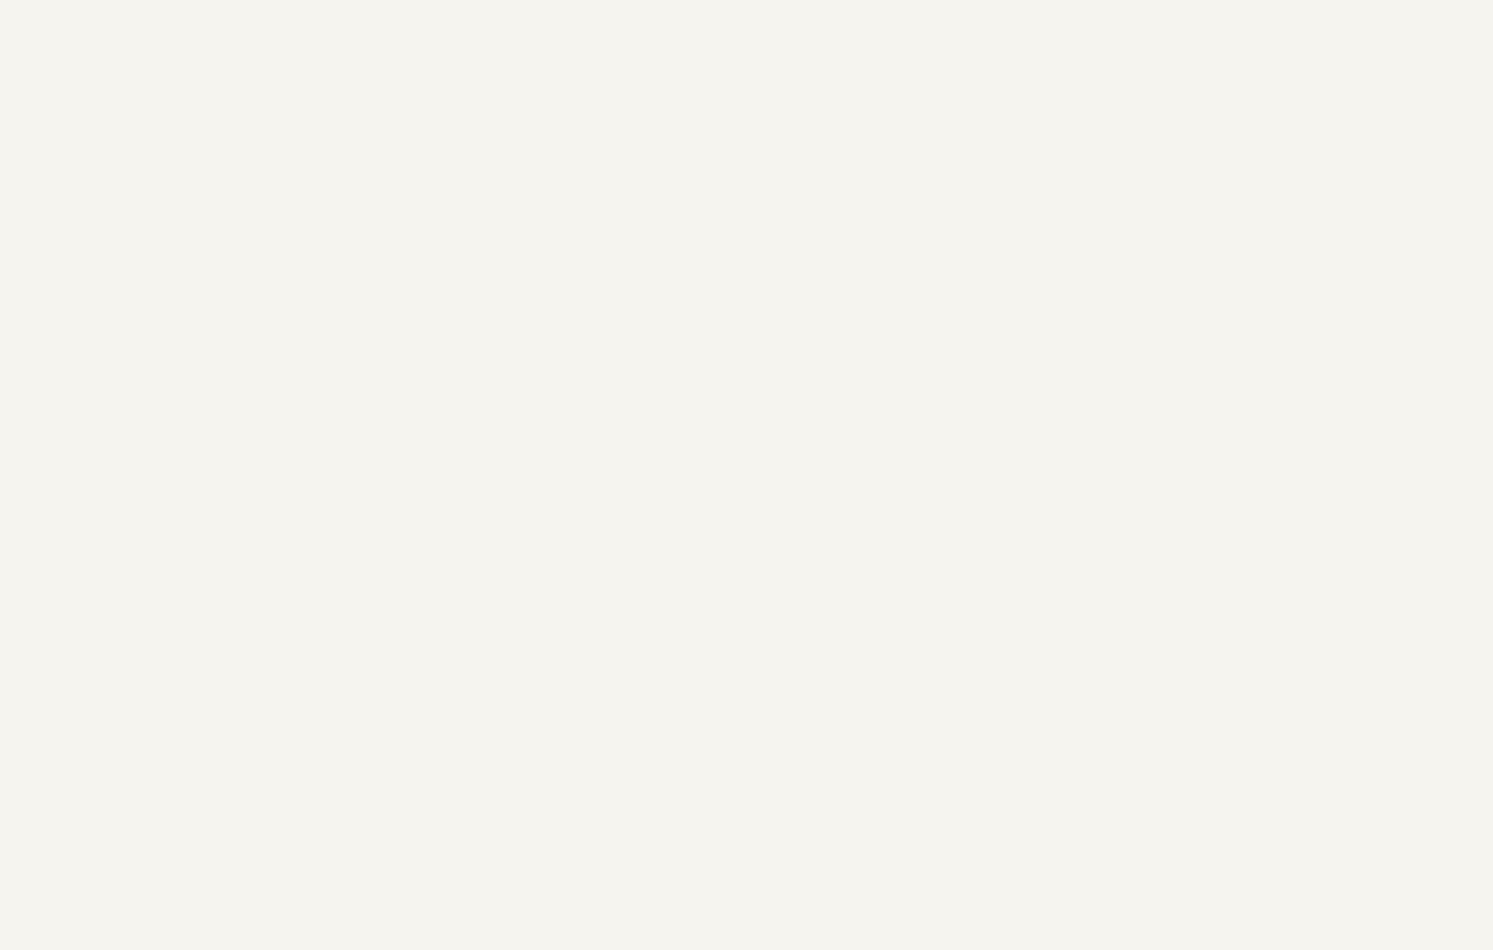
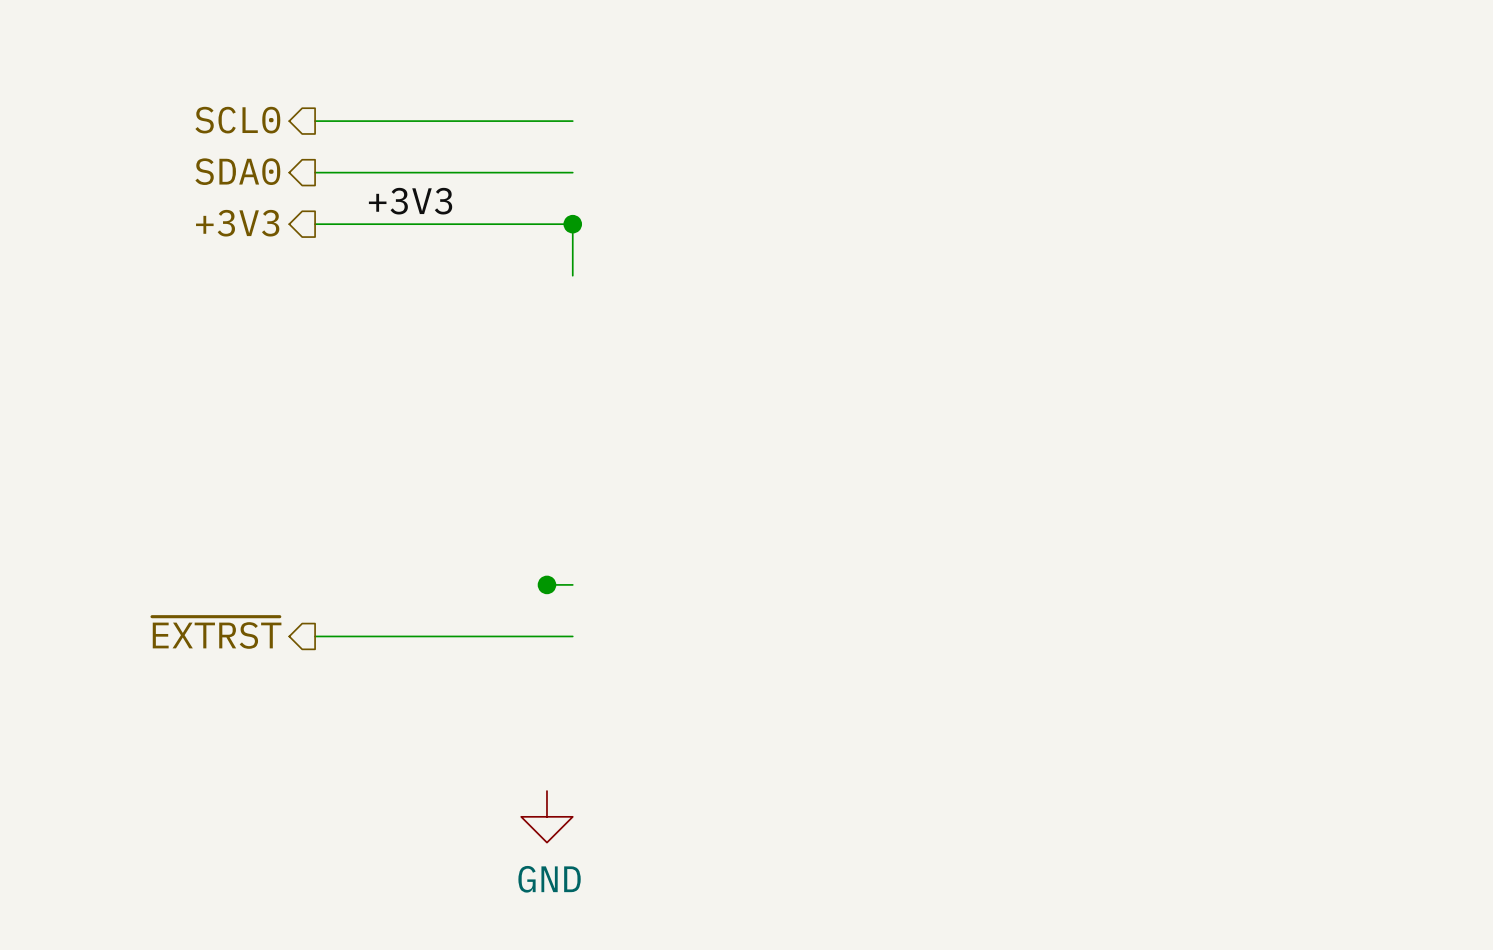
hierarchical label: none -> SCL0 (237, 120)
wire: none -> (315, 121) (572, 121)
hierarchical label: none -> SDA0 (237, 171)
wire: none -> (315, 172) (572, 172)
label: none -> +3V3 (410, 201)
hierarchical label: none -> +3V3 (237, 223)
wire: none -> (315, 224) (572, 224) (572, 275)
junction: none -> (572, 224)
wire: none -> (546, 584) (572, 584)
junction: none -> (546, 584)
hierarchical label: none -> ~{EXTRST} (216, 632)
wire: none -> (315, 636) (572, 636)
power symbol: none -> GND (546, 816)

